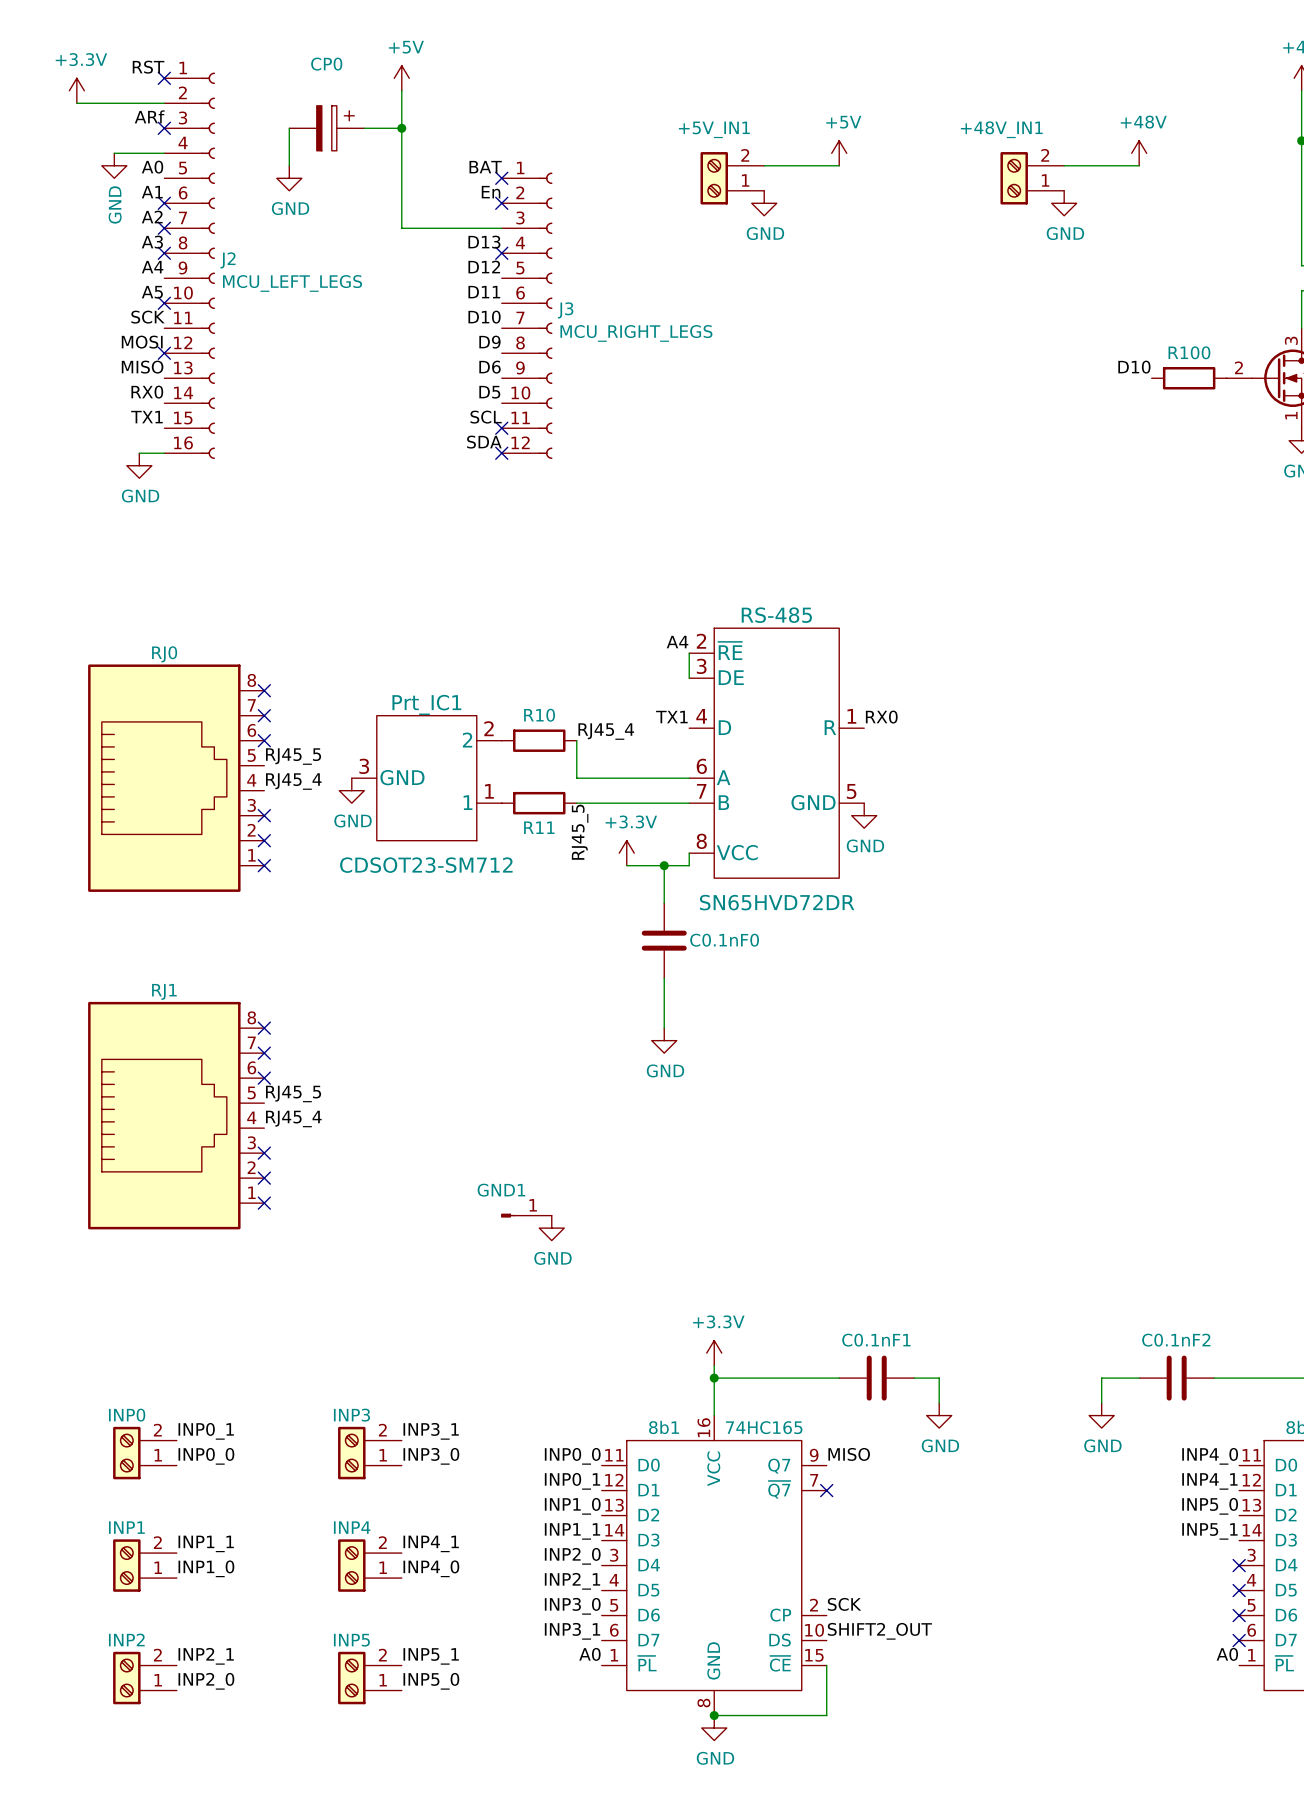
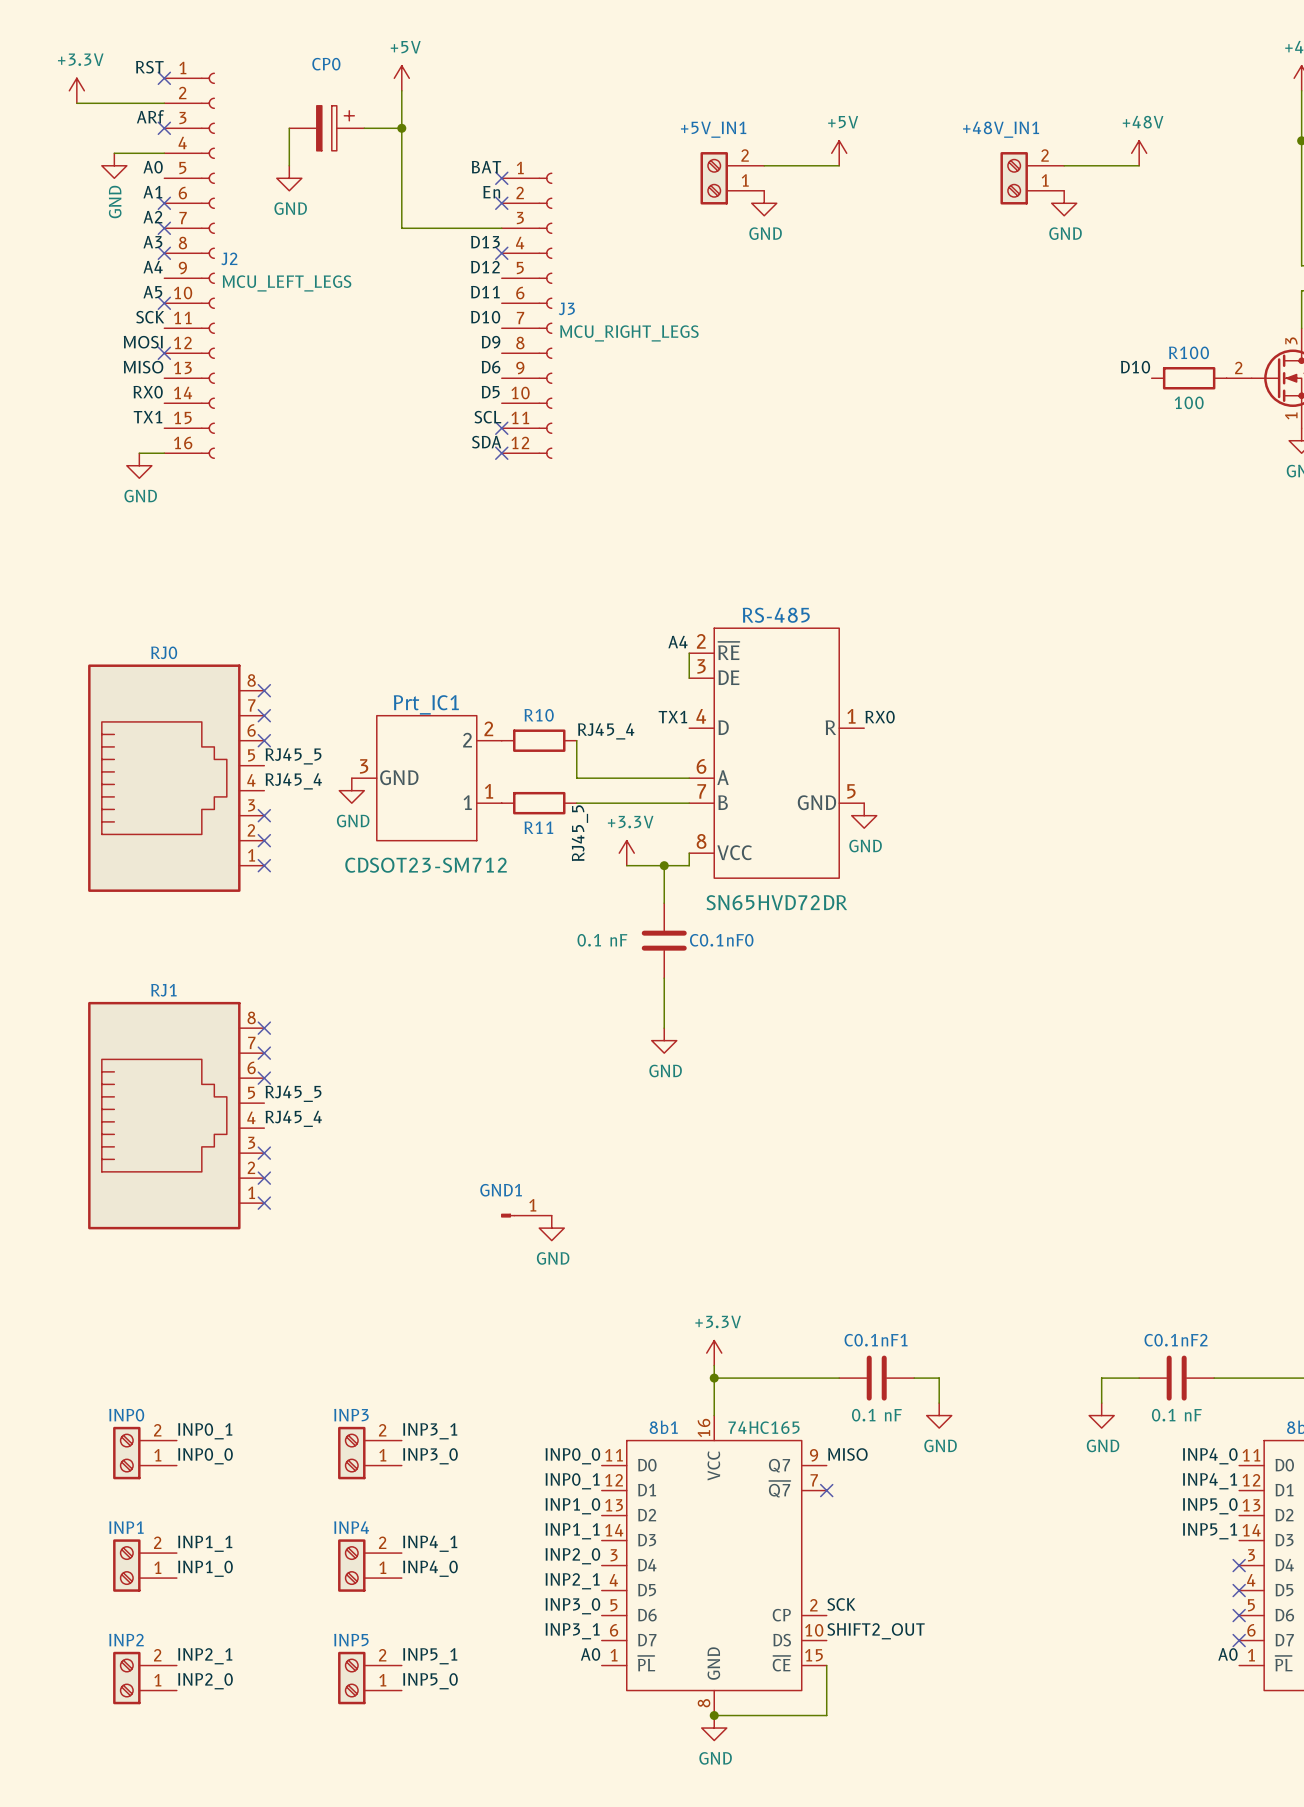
R100 value: none -> 100 (1189, 402)
C0.1nF0 value: none -> 0.1 nF (602, 940)
C0.1nF1 value: none -> 0.1 nF (876, 1415)
C0.1nF2 value: none -> 0.1 nF (1176, 1415)

